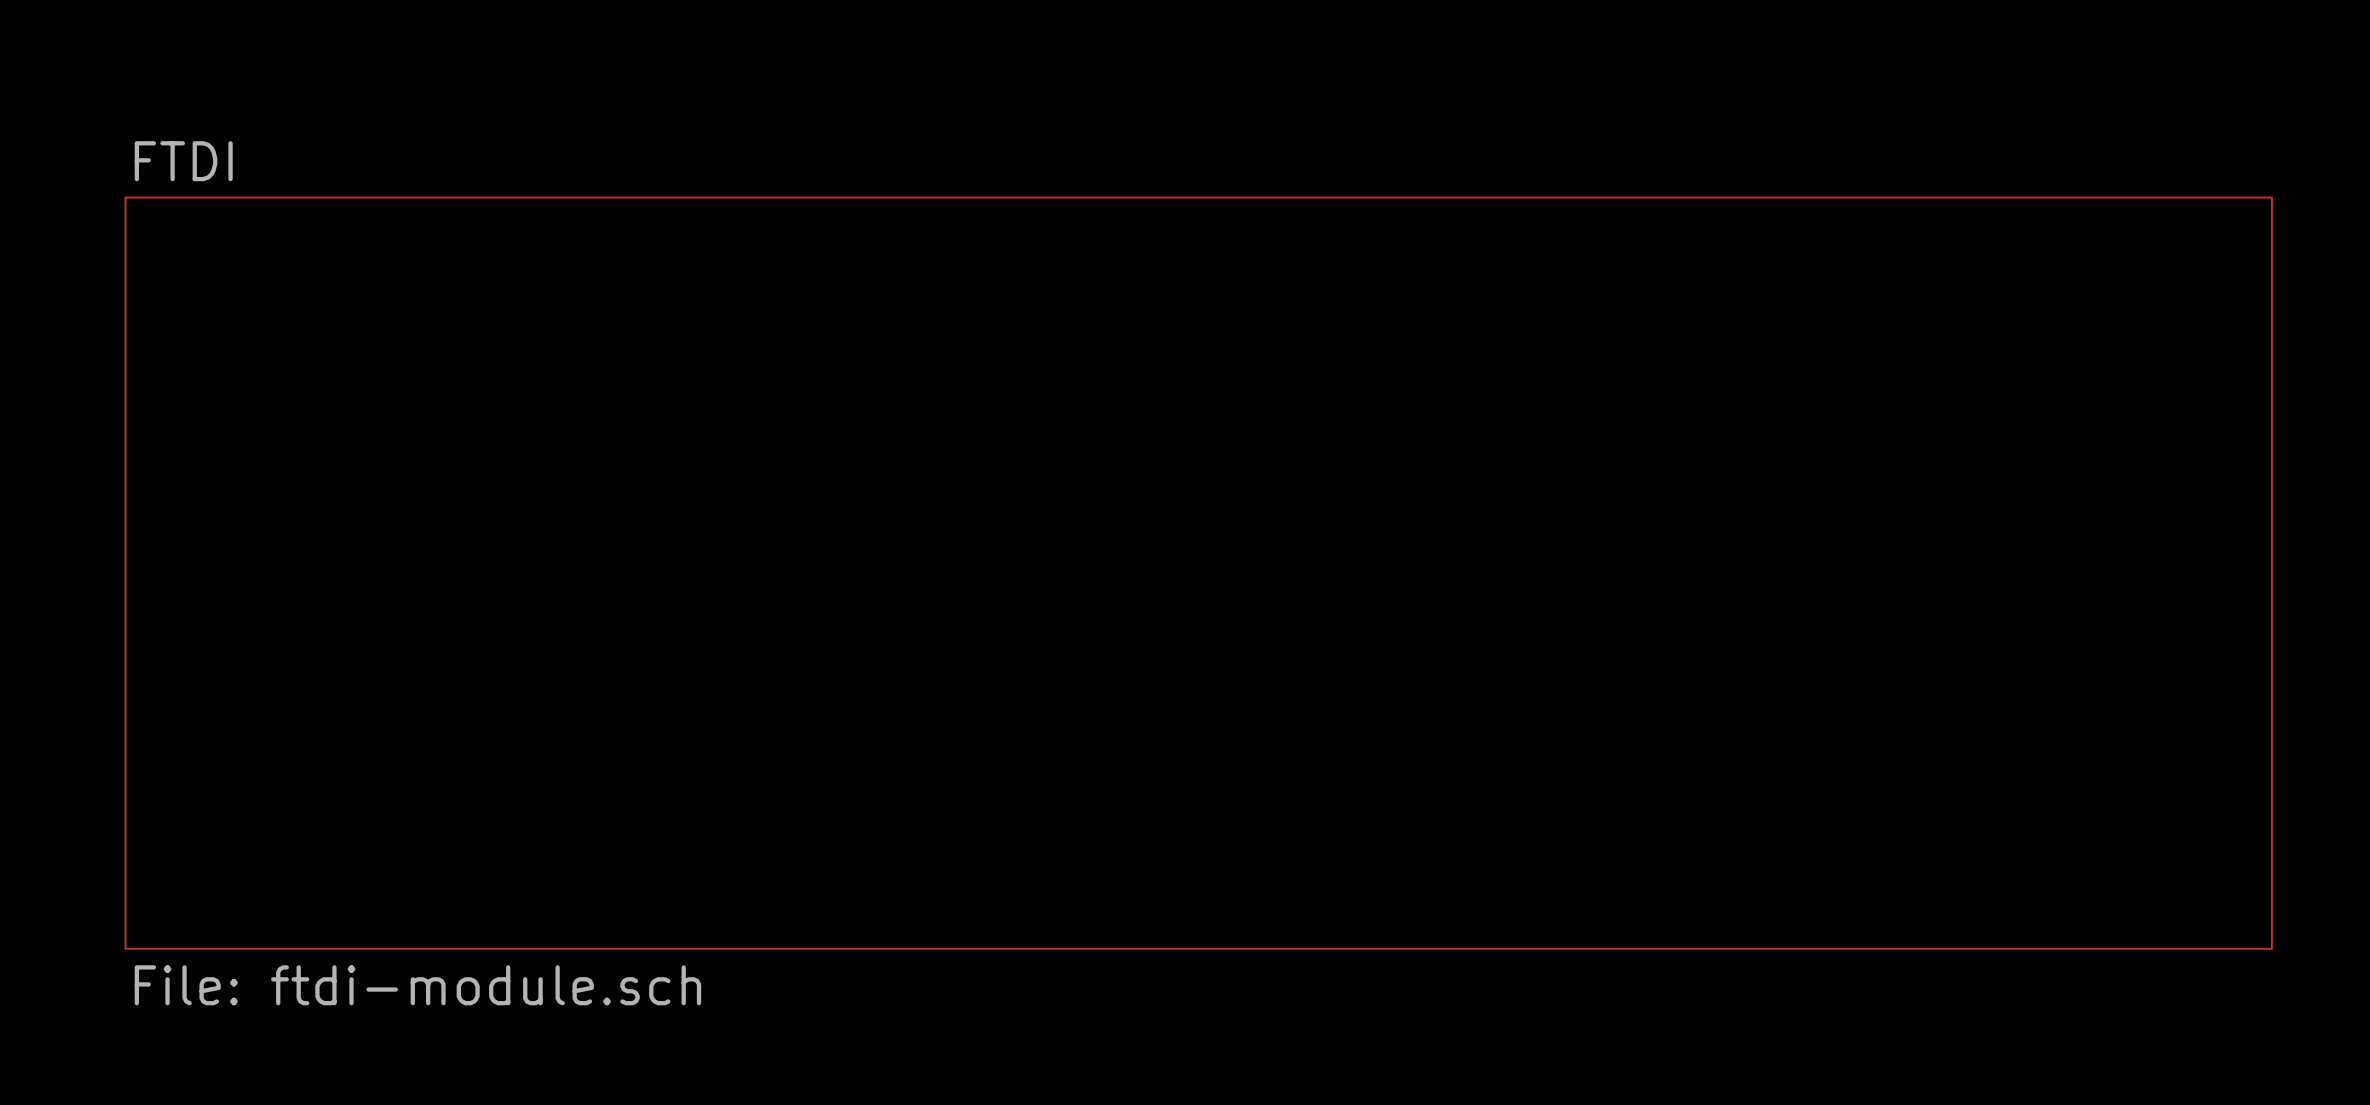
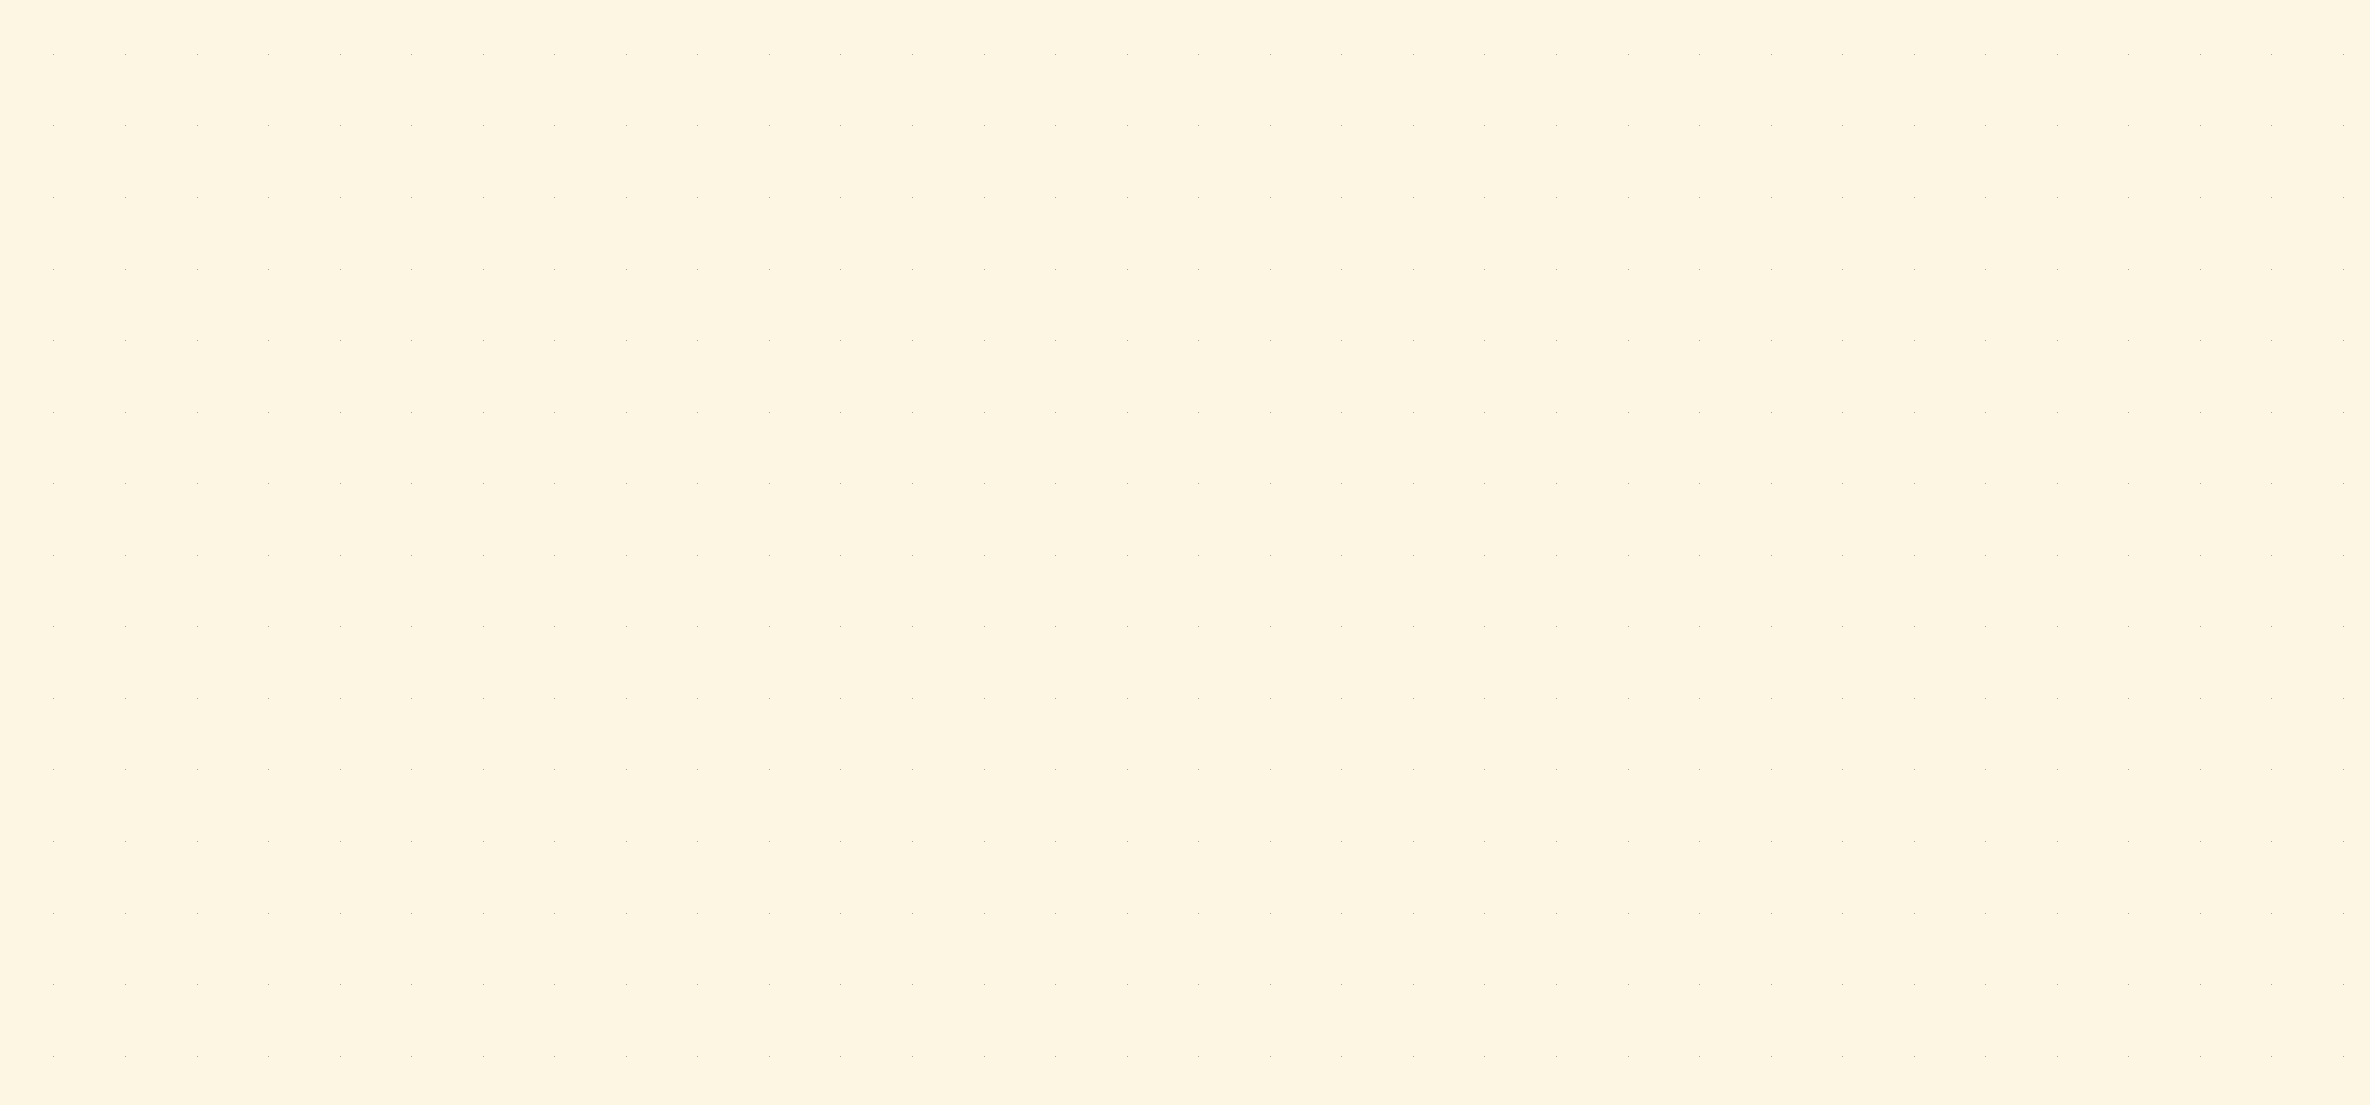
sheet FTDI: File: ftdi-module.sch (1198, 573) -> none

